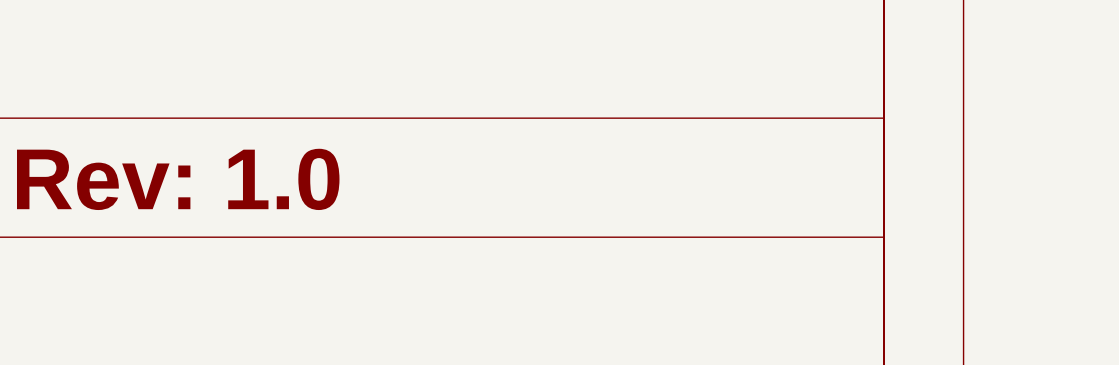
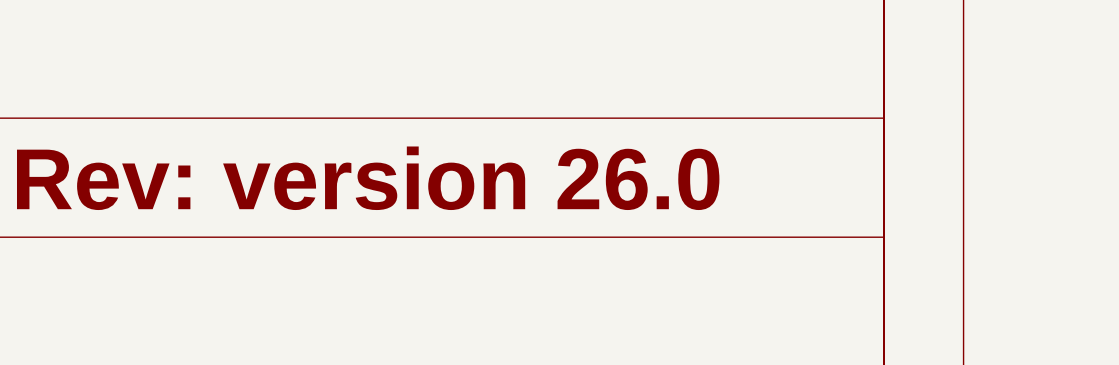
title block: Rev: 1.0 (178, 179) -> Rev: version 26.0 (368, 178)

